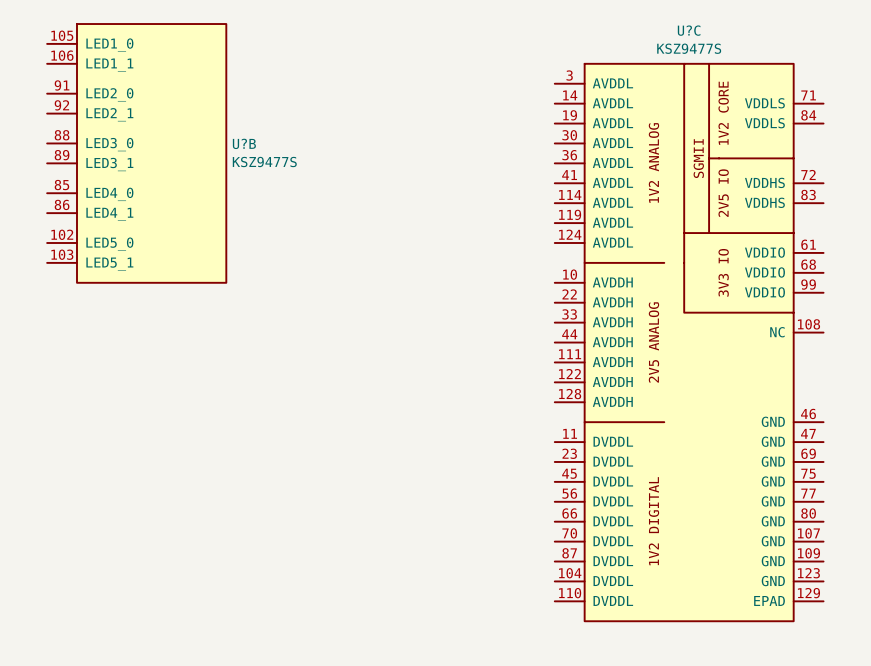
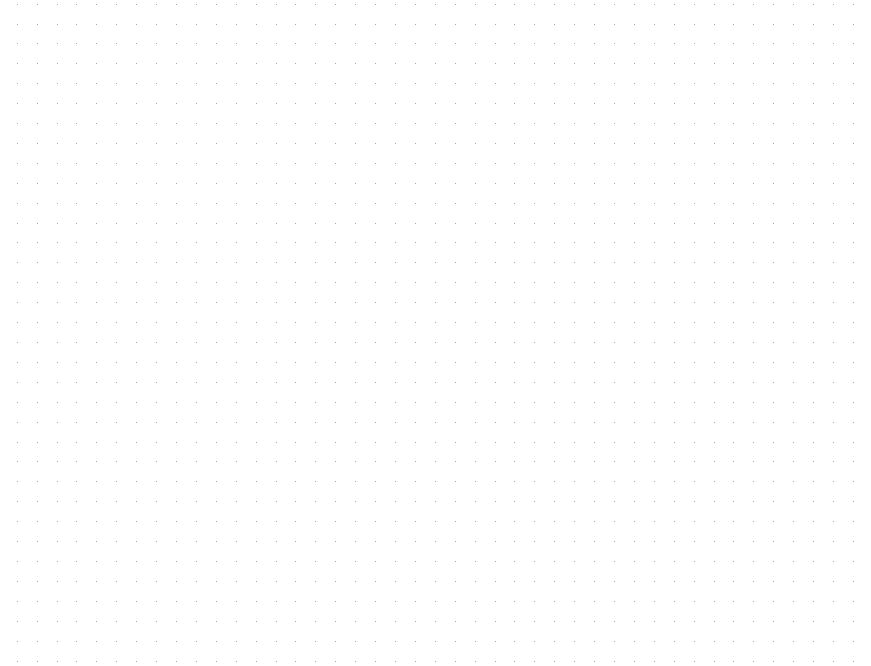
U?B: KSZ9477S (136, 153) -> none
U?C: KSZ9477S (689, 342) -> none

